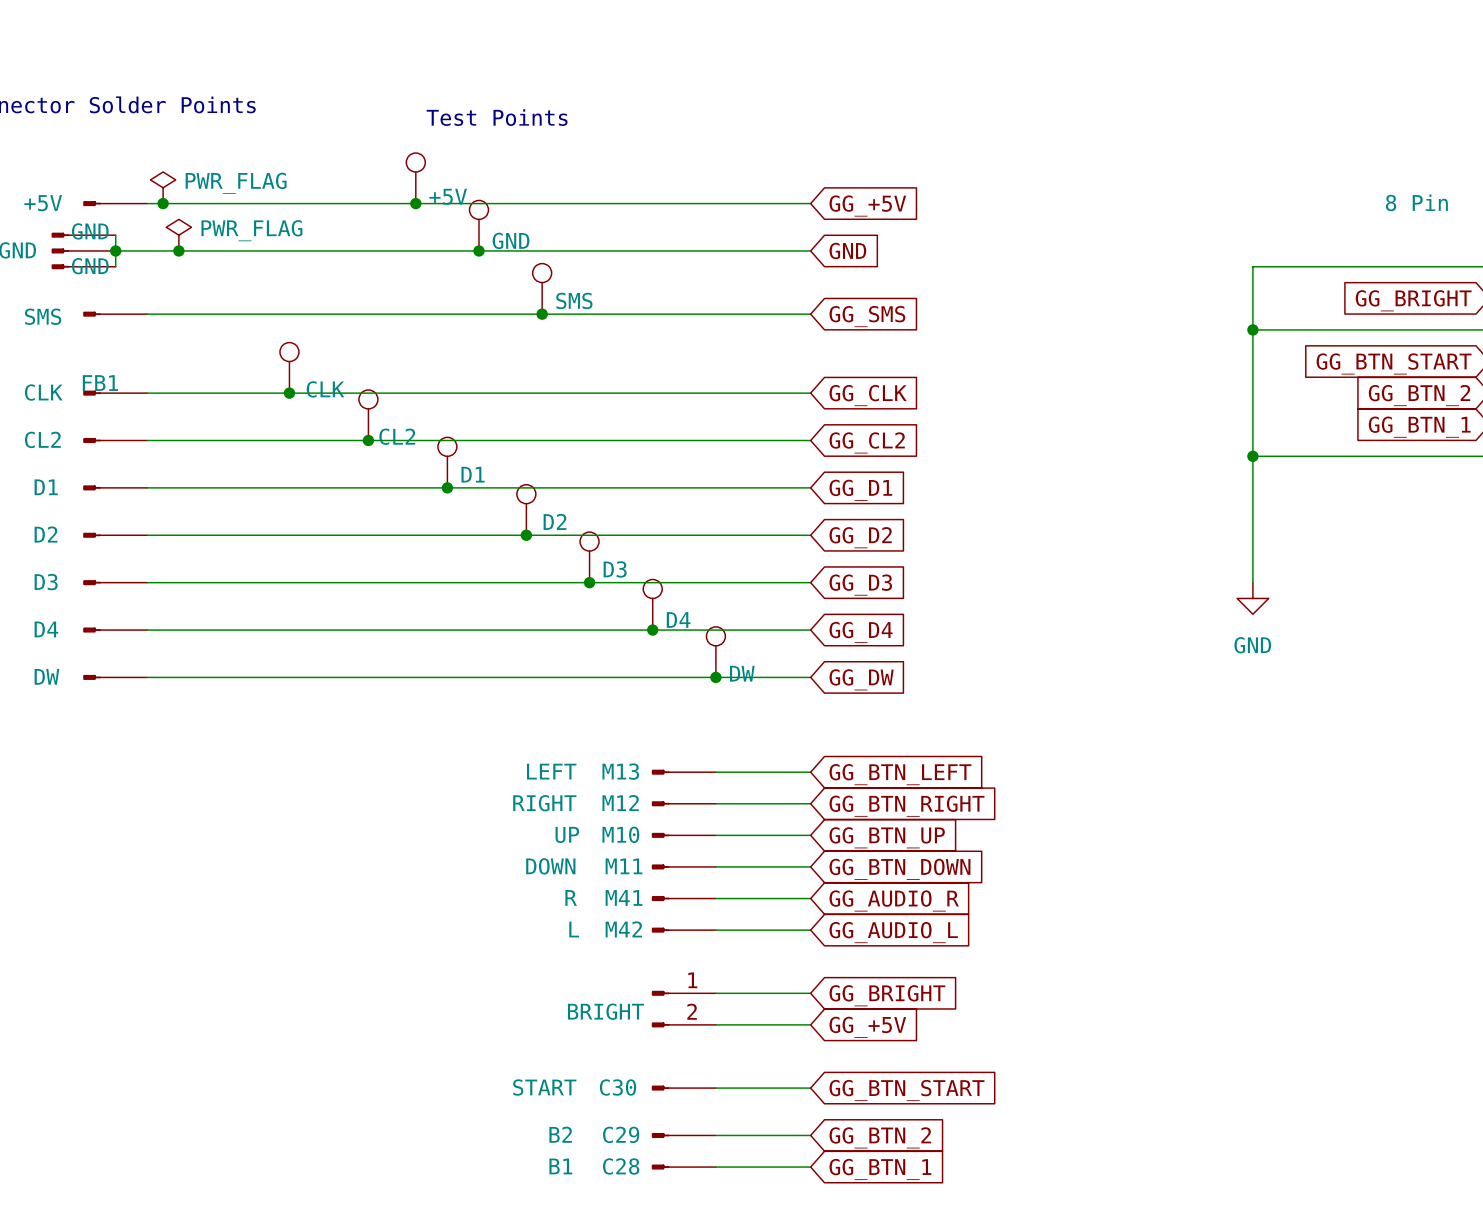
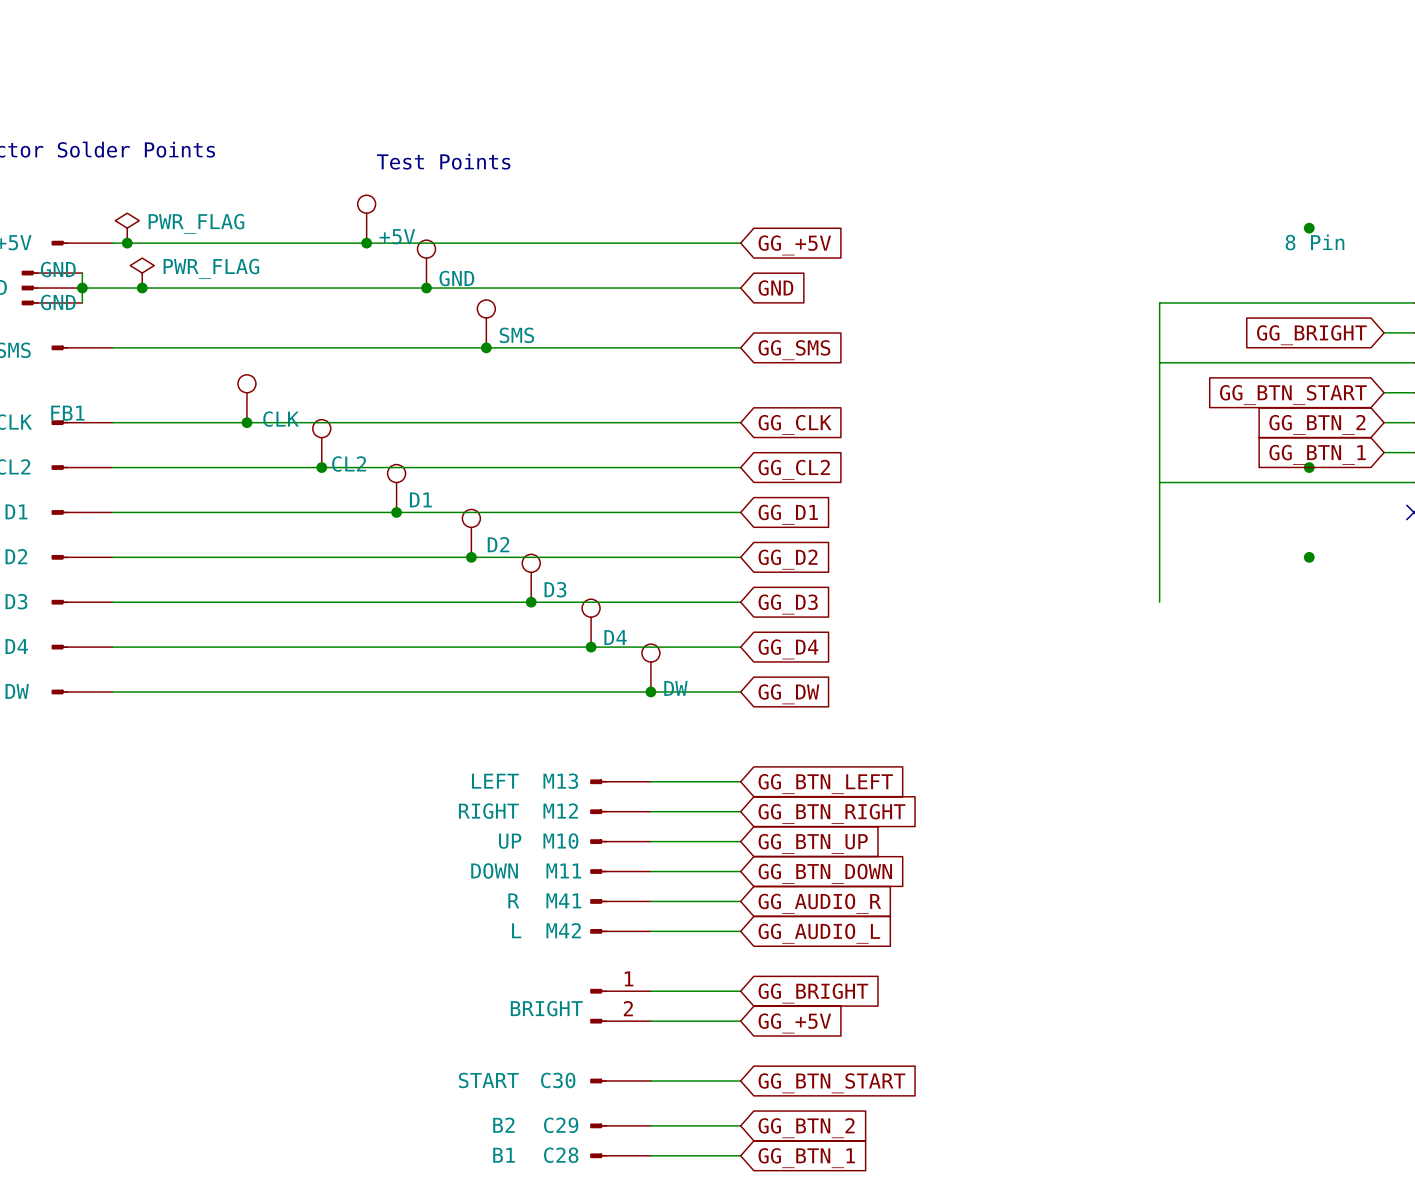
junction: none -> (1309, 228)
junction: (1252, 329) -> none
junction: none -> (1309, 467)
junction: (1252, 456) -> none
junction: none -> (1309, 557)
power symbol: GND (1252, 598) -> none

